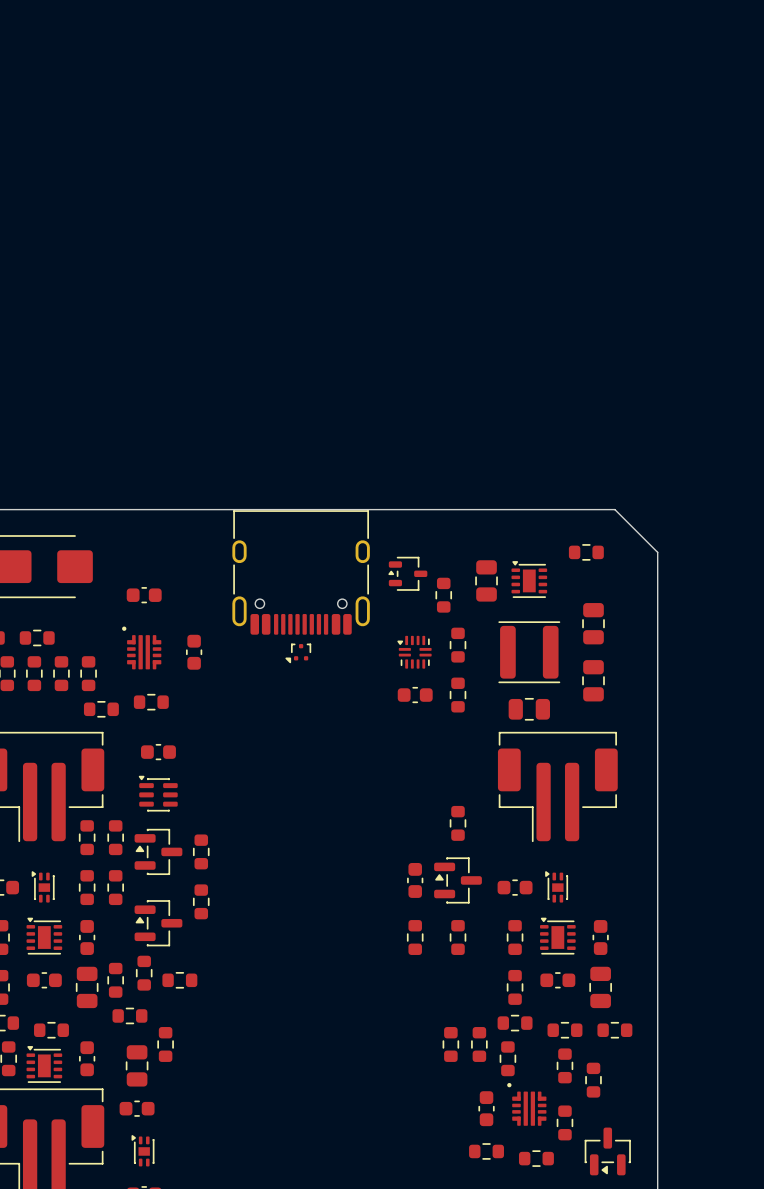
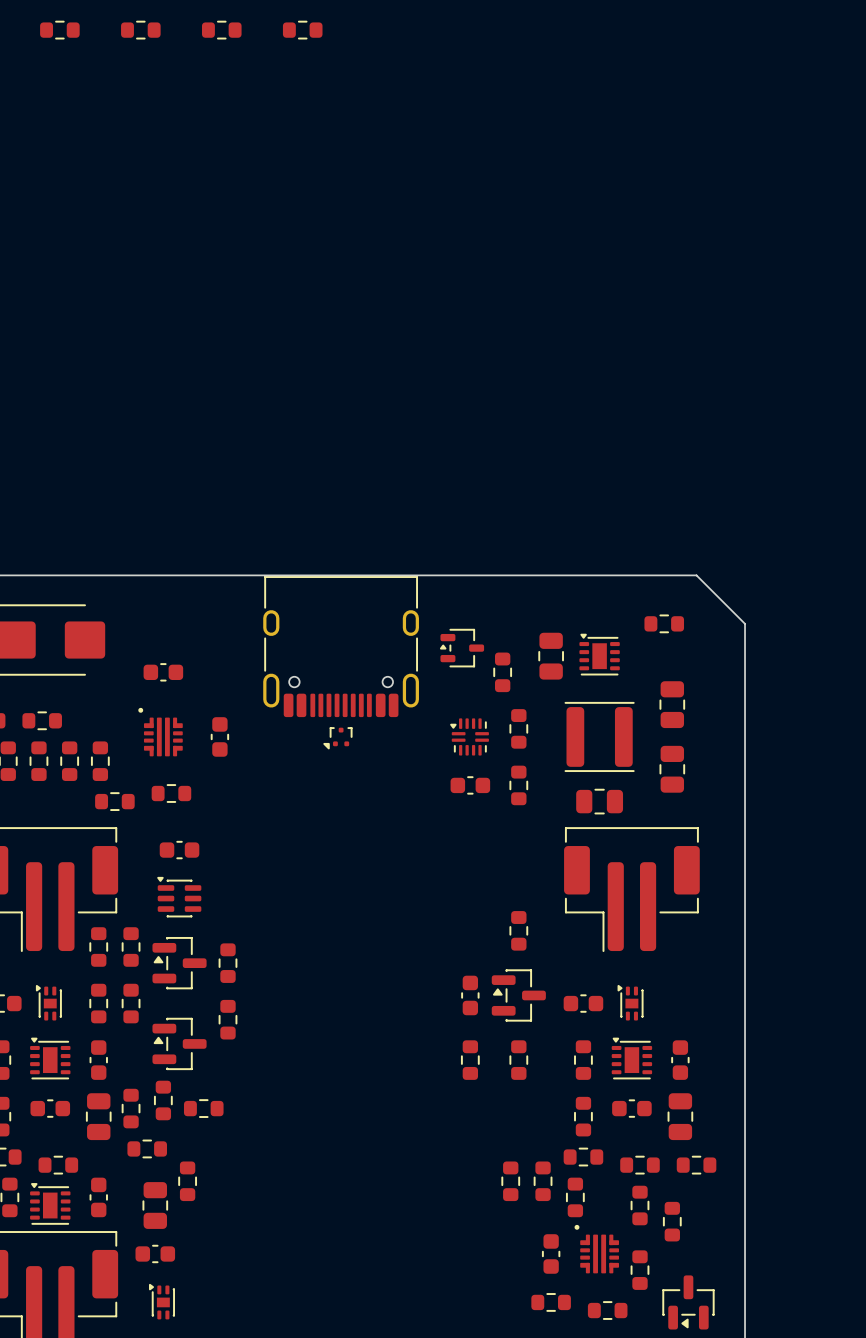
part: none -> (59, 30)
part: none -> (140, 30)
part: none -> (221, 30)
part: none -> (302, 30)

